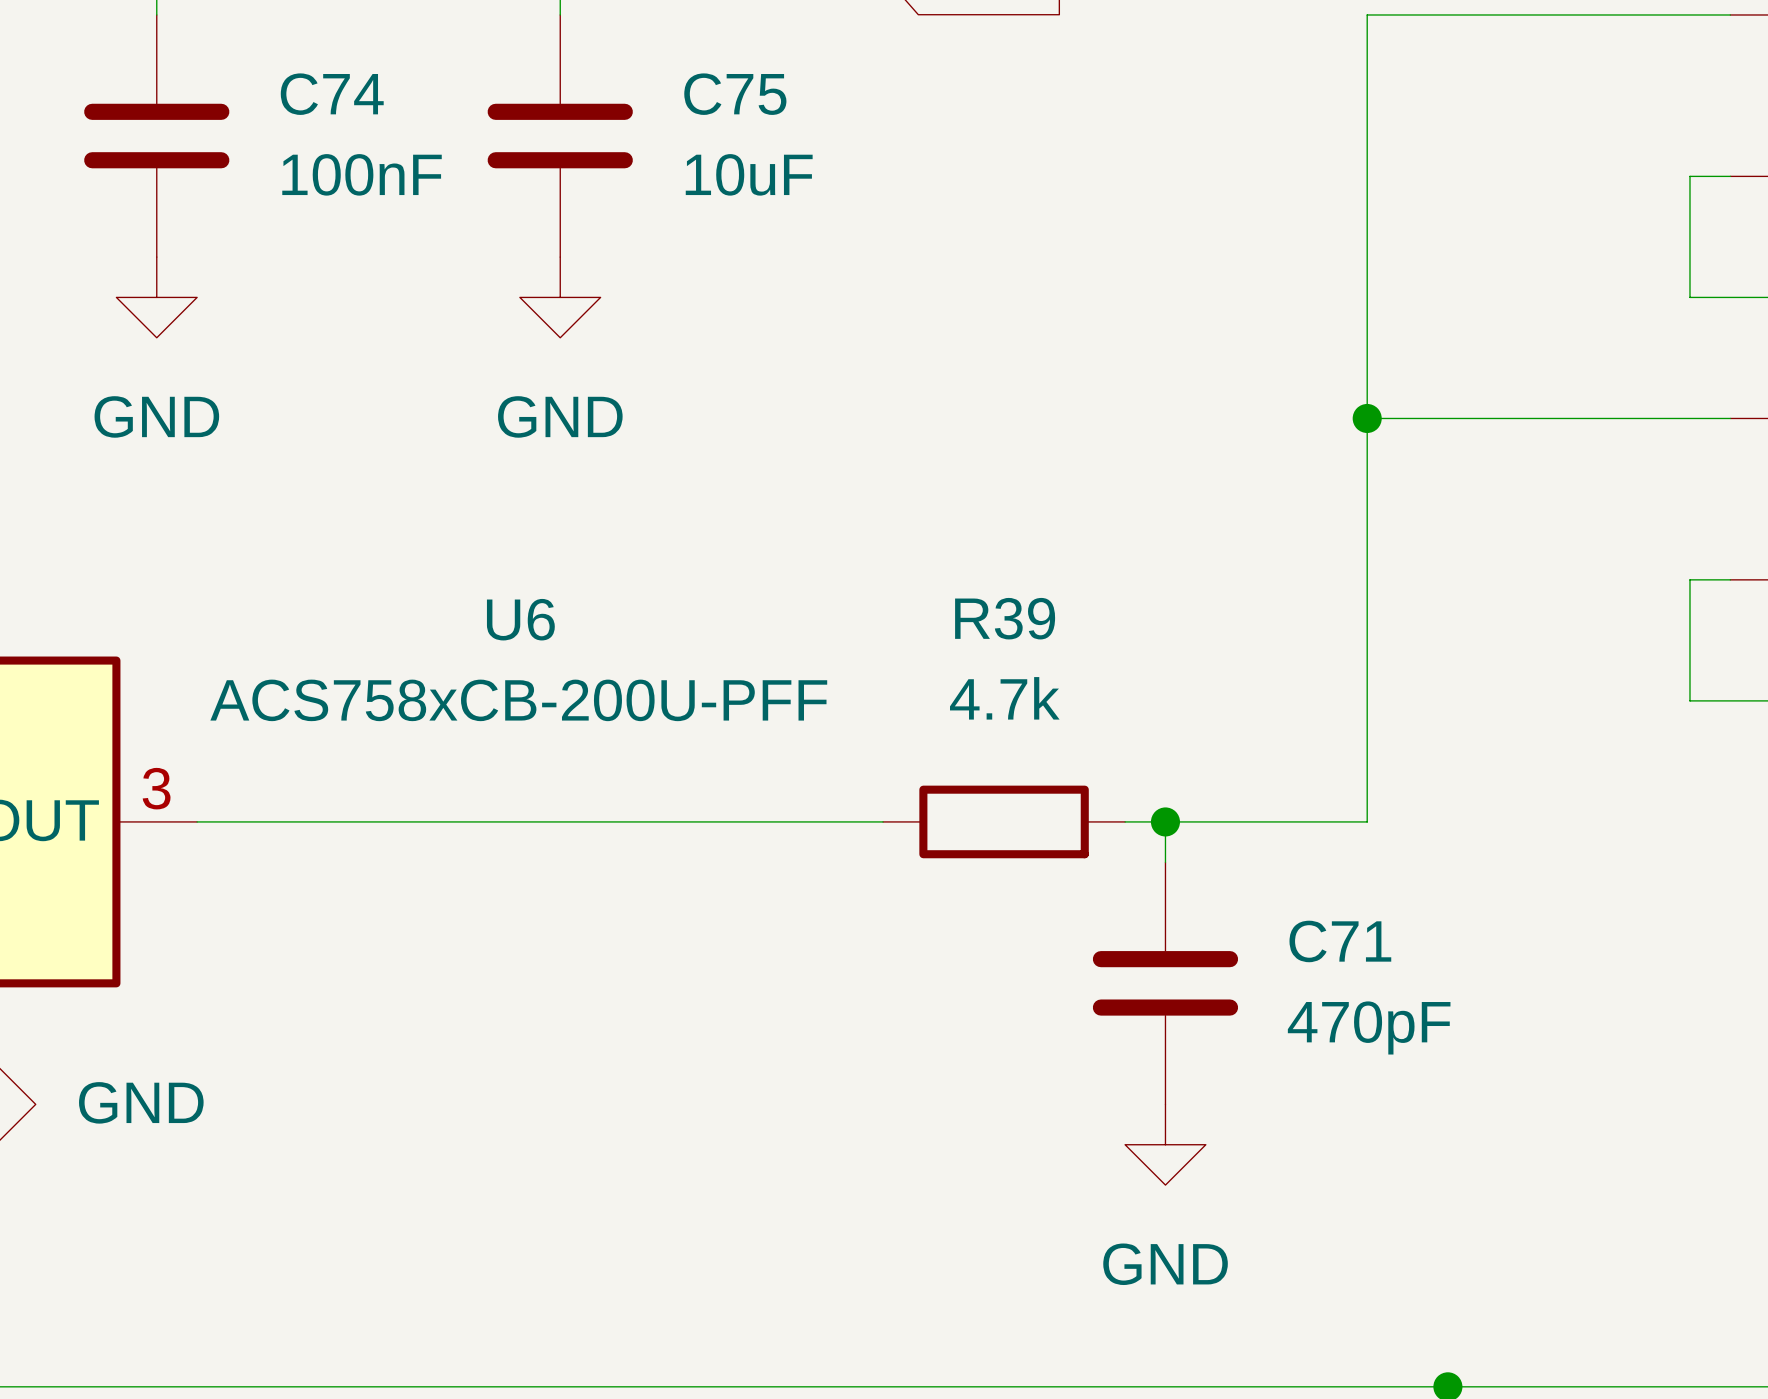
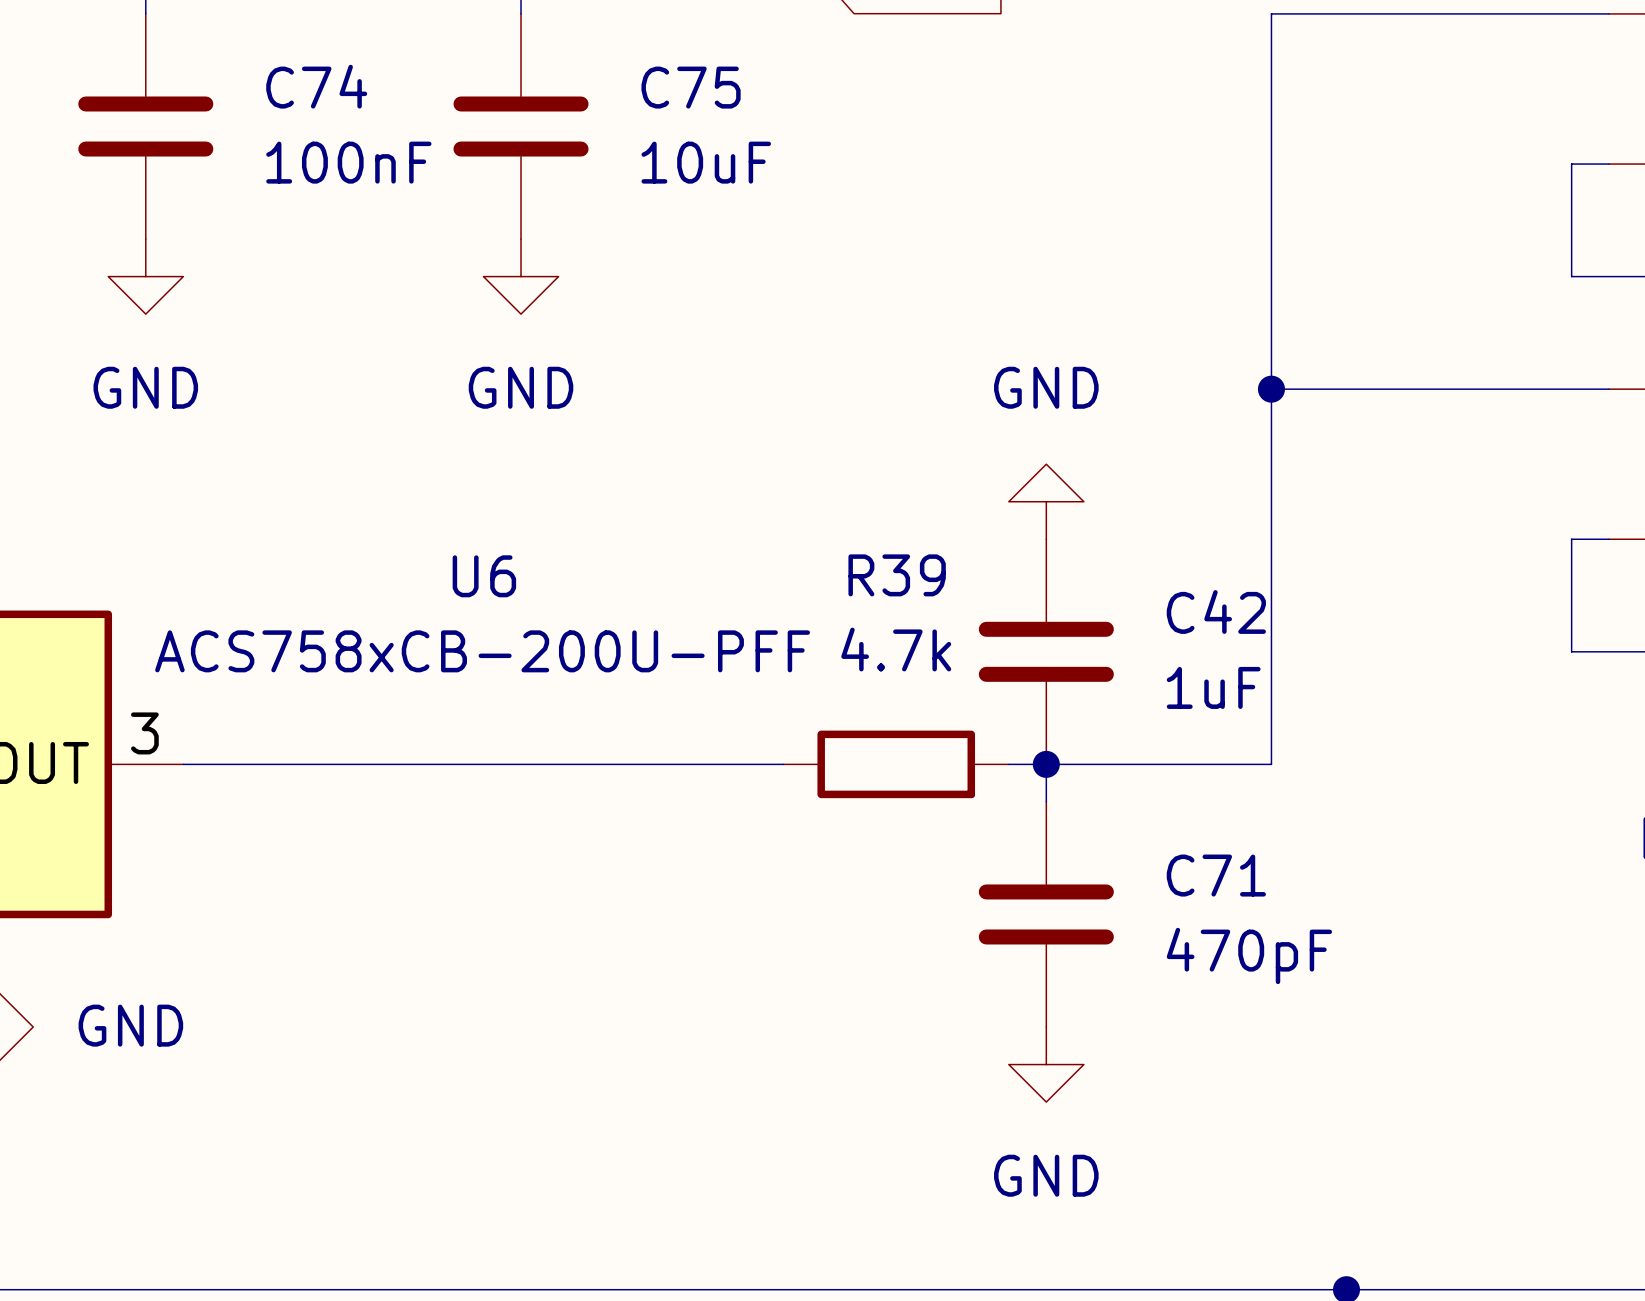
power symbol: none -> GND (1046, 501)
C42: none -> 1uF (1046, 651)
R39 position: (1004, 821) -> (896, 764)
wire: none -> (1008, 764) (1046, 764) (1046, 801)
wire: (1165, 821) (1165, 862) -> none
junction position: (1165, 821) -> (1046, 764)
C71 position: (1165, 983) -> (1046, 914)
power symbol position: GND (1165, 1144) -> GND (1046, 1064)

